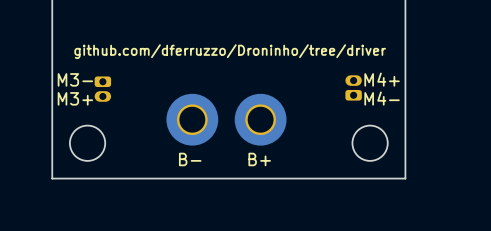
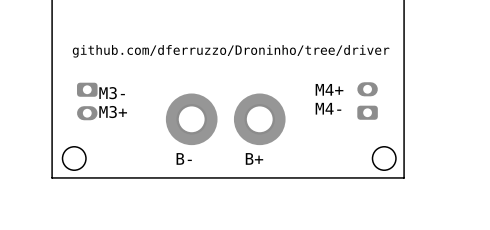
text position: M3- (75, 79) -> M3- (112, 93)
text position: M4+ (382, 79) -> M4+ (329, 89)
part: (353, 87) -> none
part: (102, 89) -> none
text position: M3+ (75, 98) -> M3+ (113, 112)
text position: M4- (382, 98) -> M4- (328, 108)
part: none -> (87, 101)
part: none -> (367, 101)
round board edge: [69, 125, 106, 162] -> none
round board edge: [351, 125, 389, 162] -> none
round board edge: none -> [61, 146, 87, 171]
round board edge: none -> [371, 146, 397, 171]

